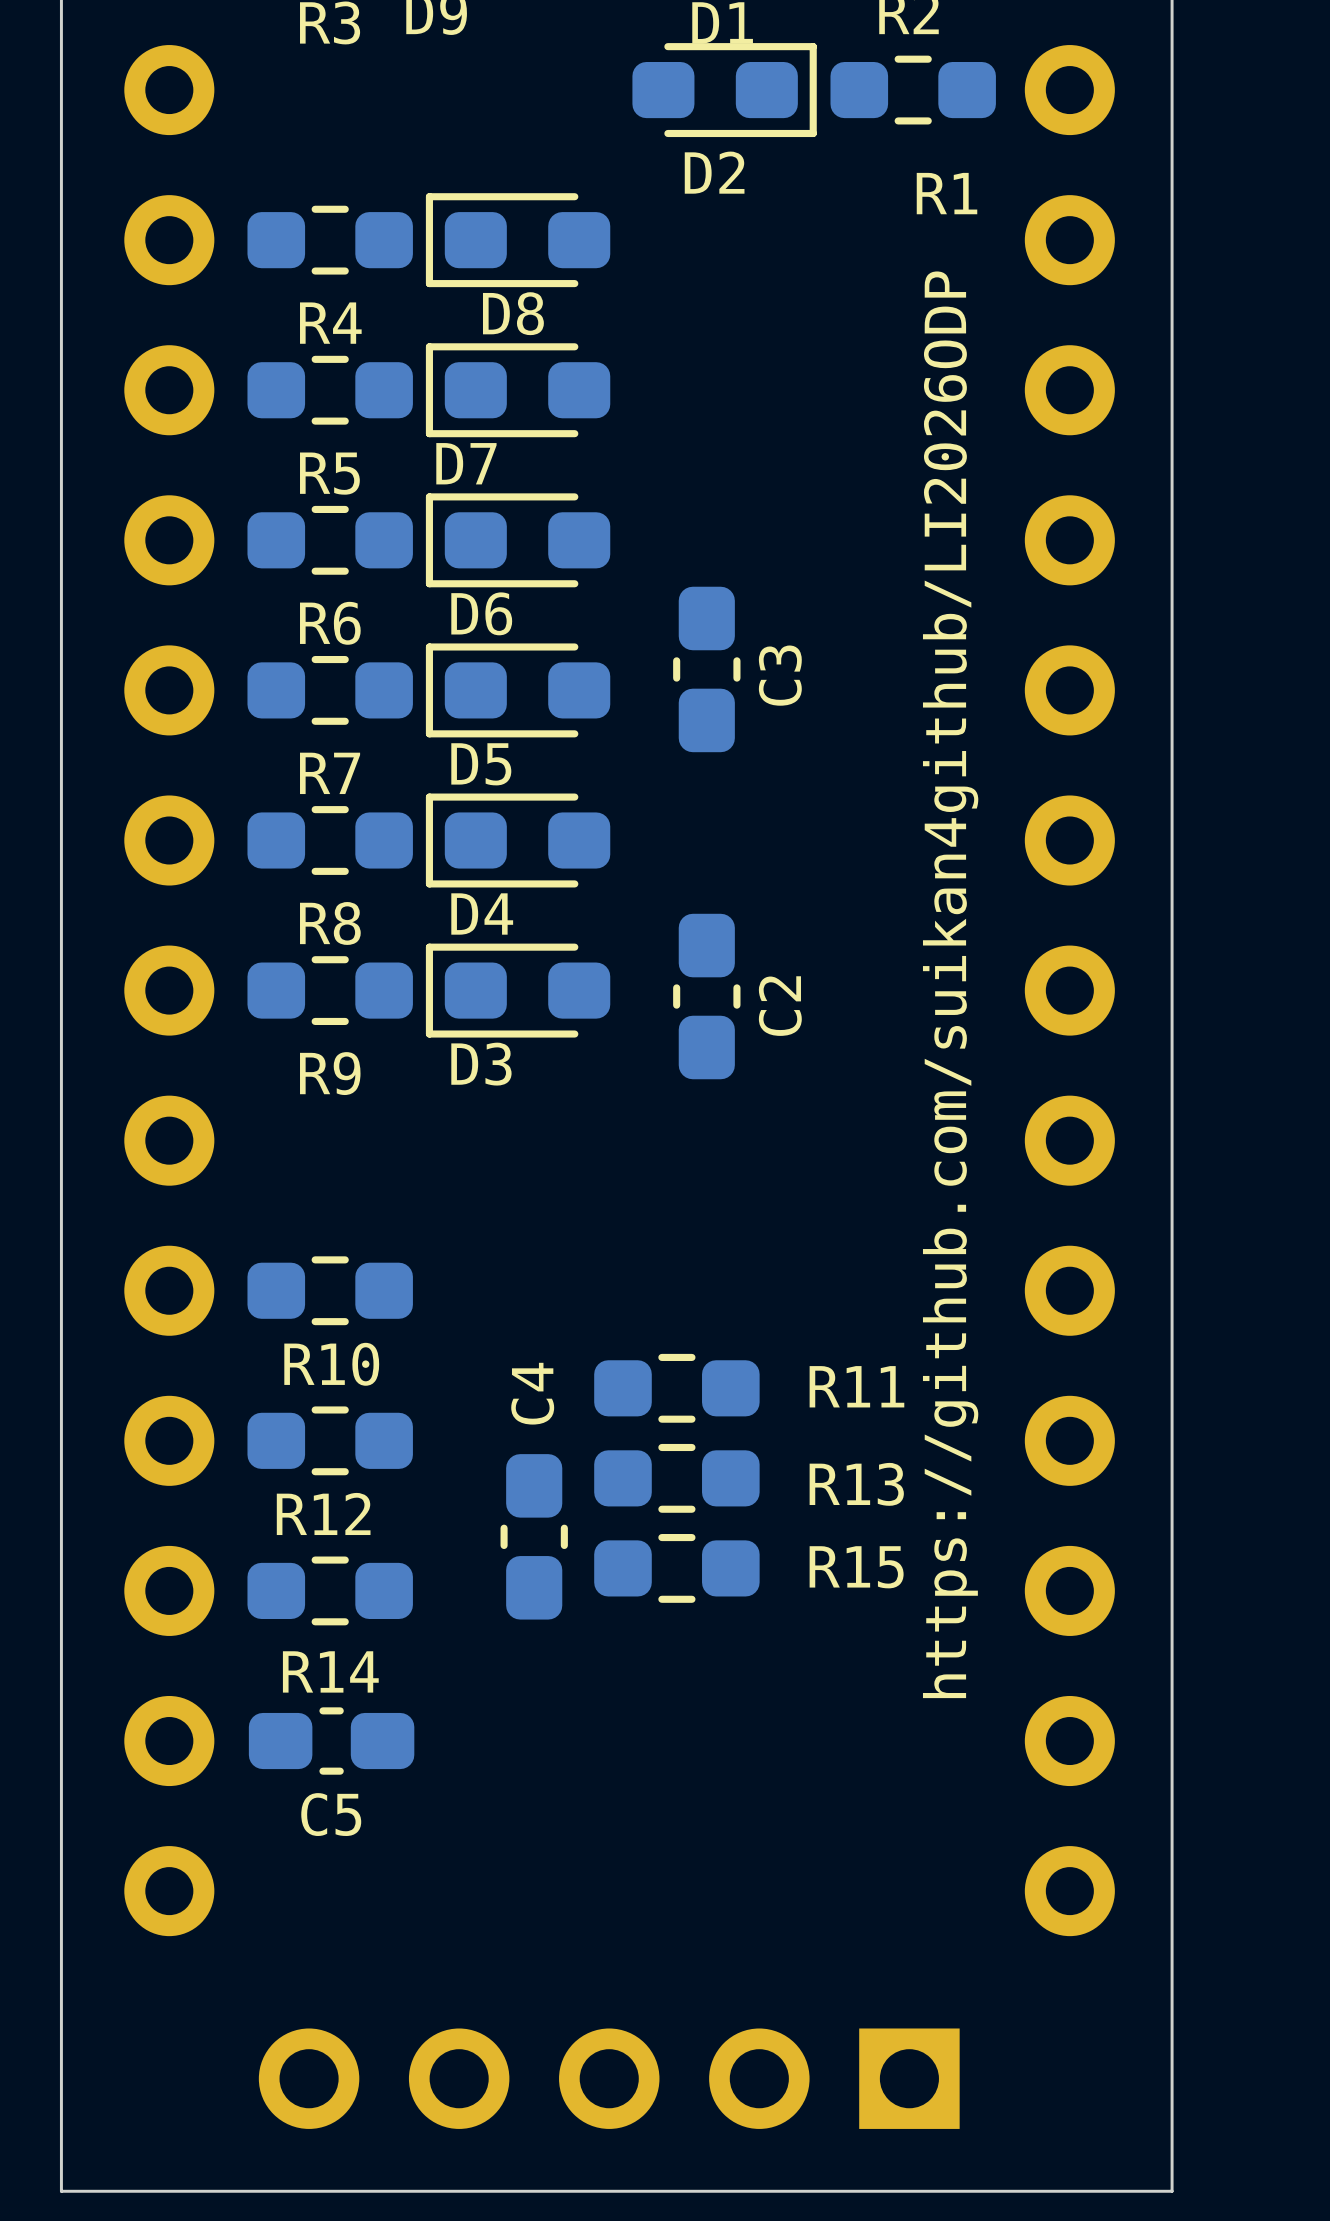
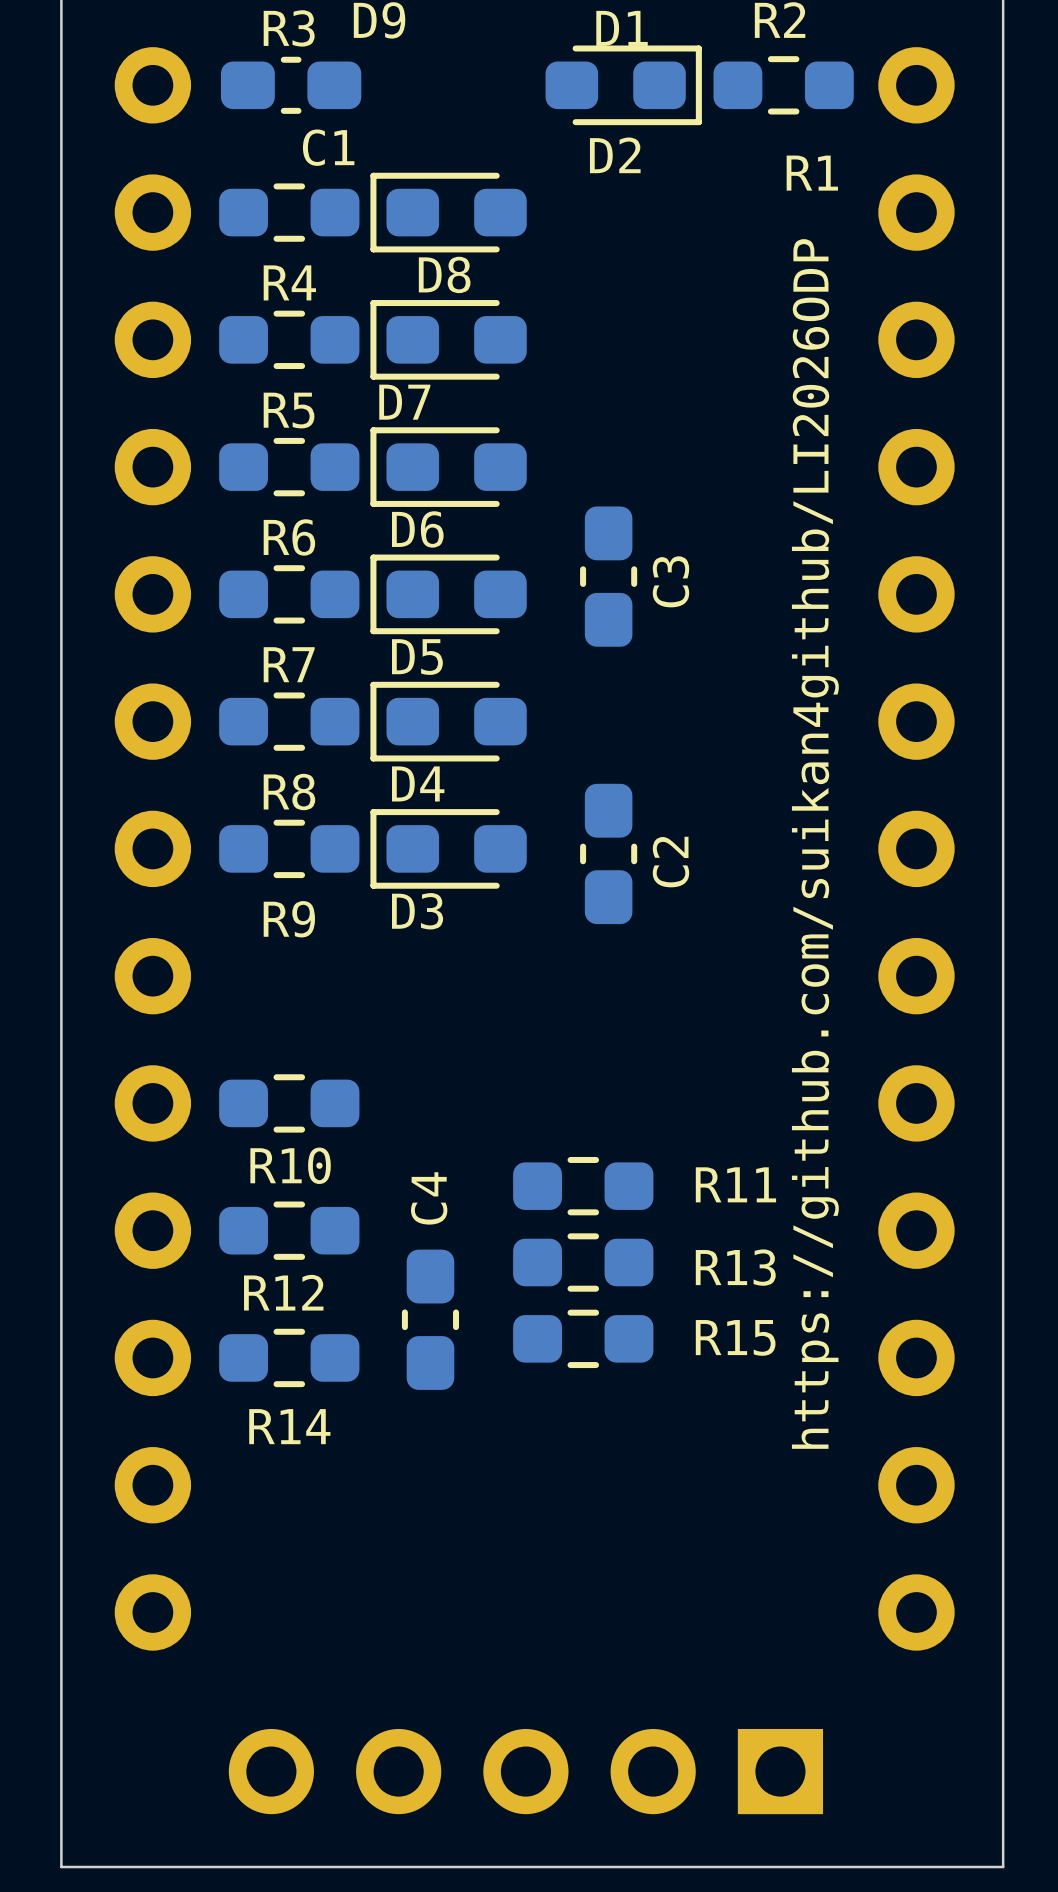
C1: none -> (291, 85)
C4 position: (534, 1536) -> (430, 1319)
C5: (331, 1741) -> none

